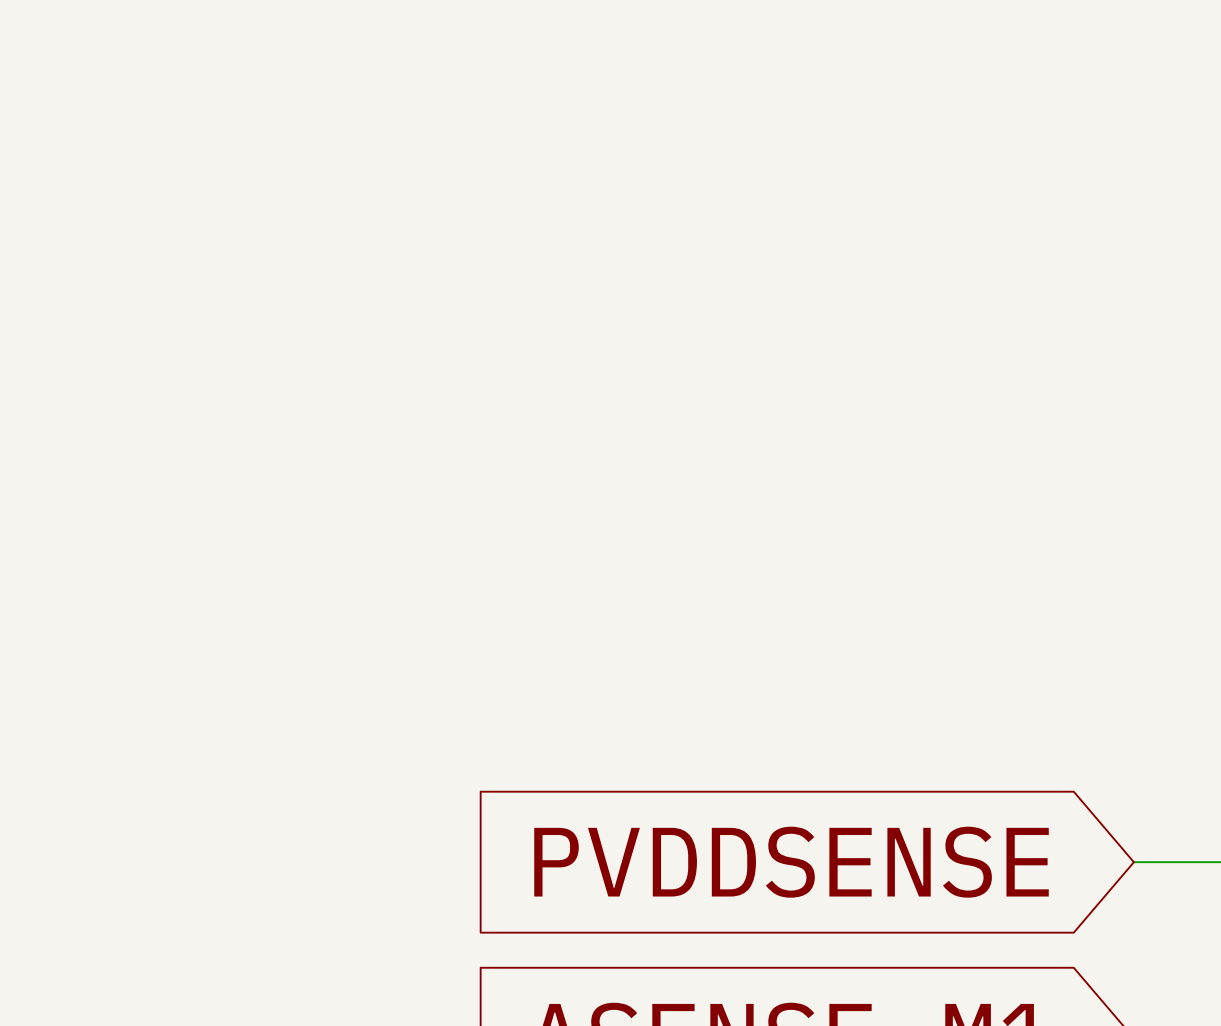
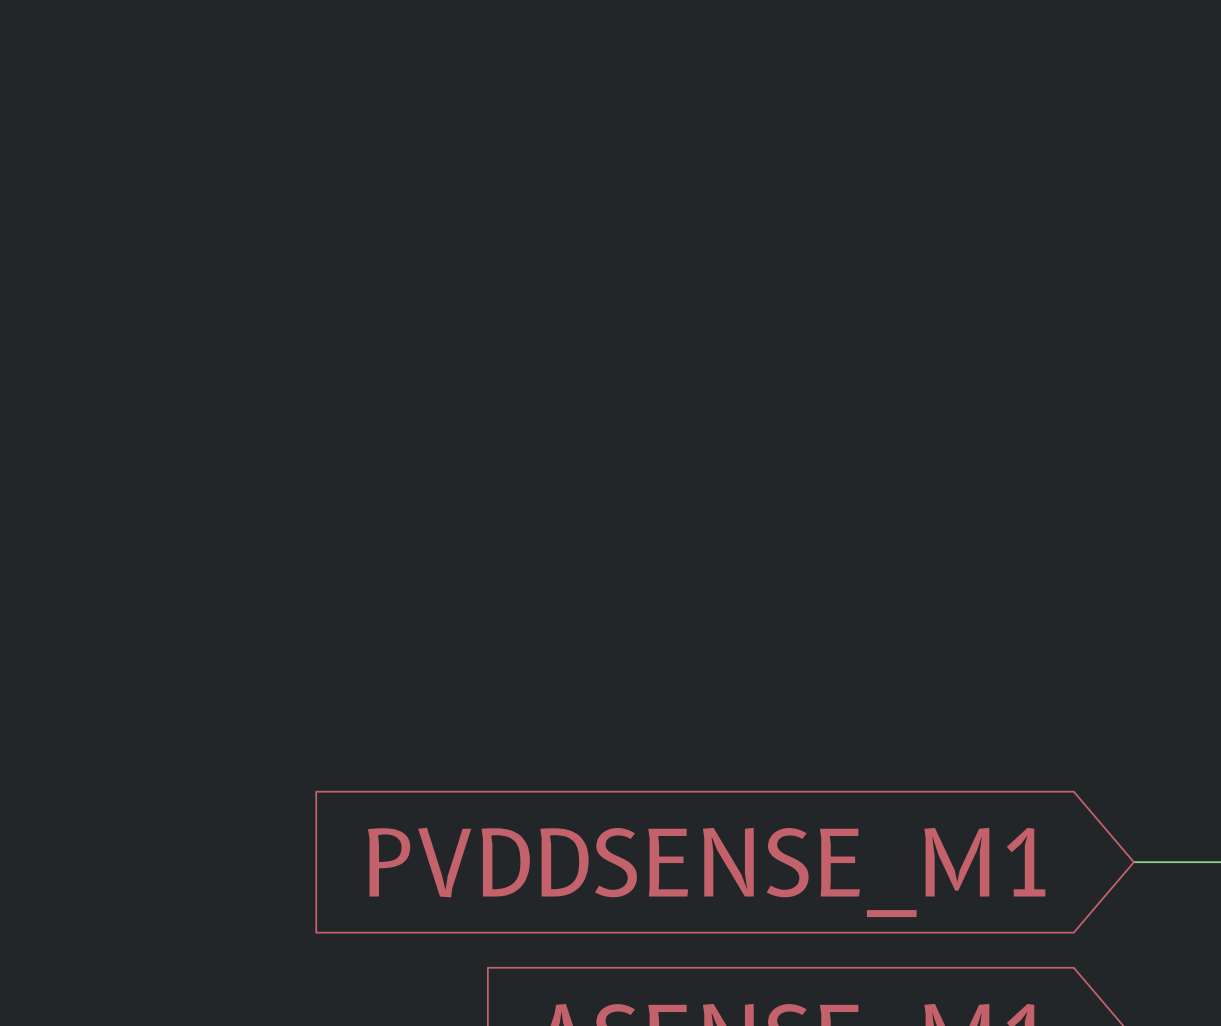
global label: PVDDSENSE (791, 862) -> PVDDSENSE_M1 (706, 872)

